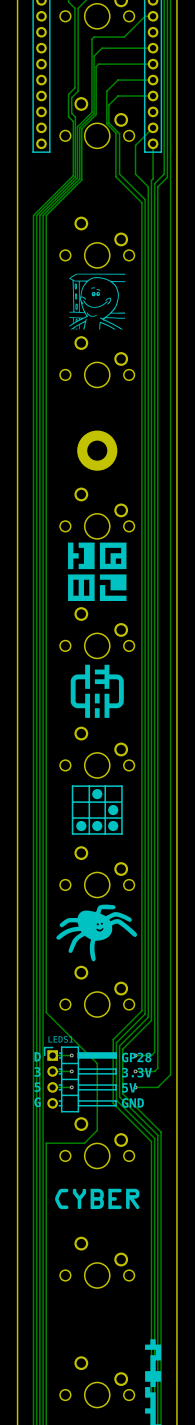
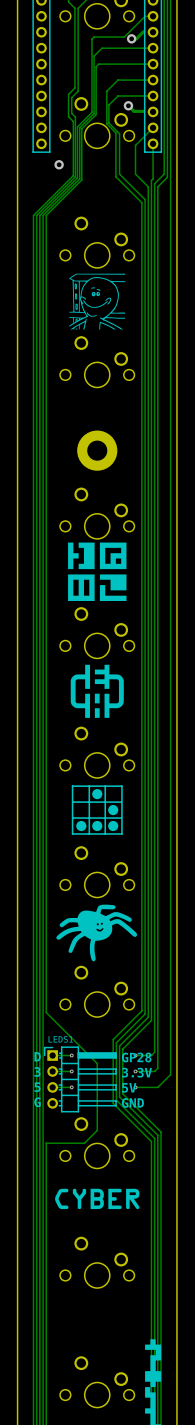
track: none -> (143, 31) (136, 38) (131, 38)
via: none -> (131, 38)
track: none -> (128, 105) (134, 111) (143, 111)
via: none -> (128, 105)
via: none -> (59, 164)

